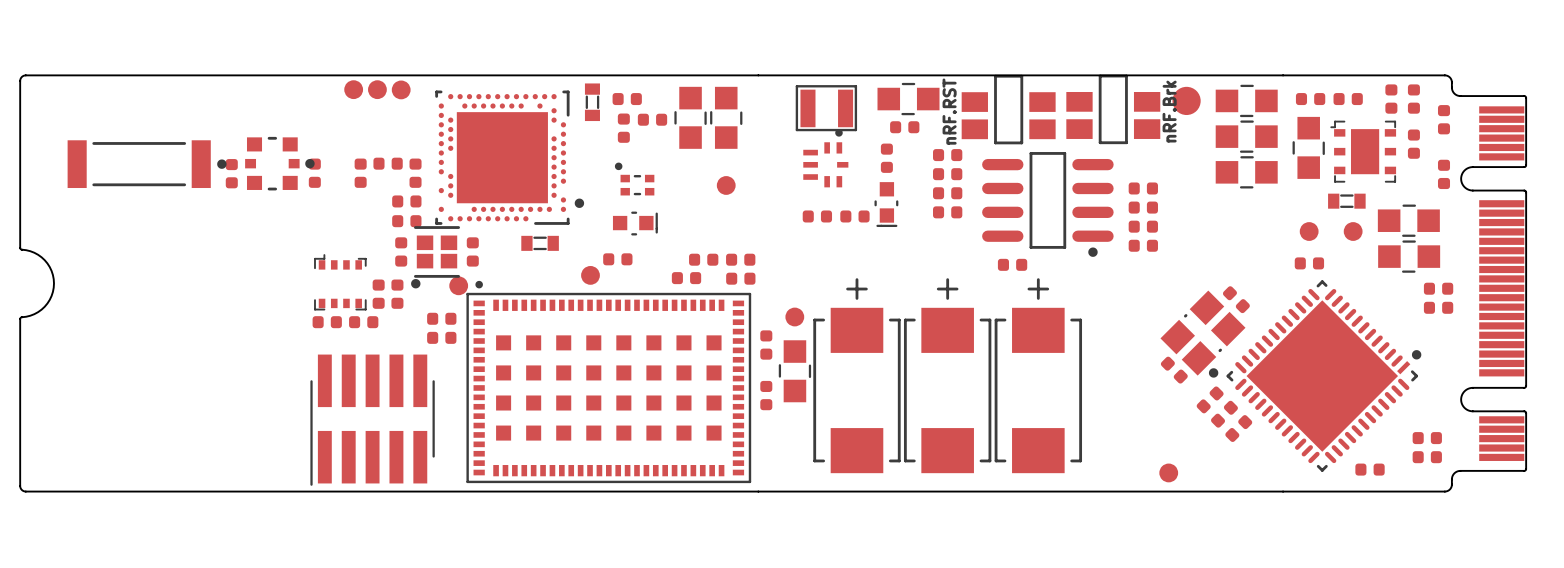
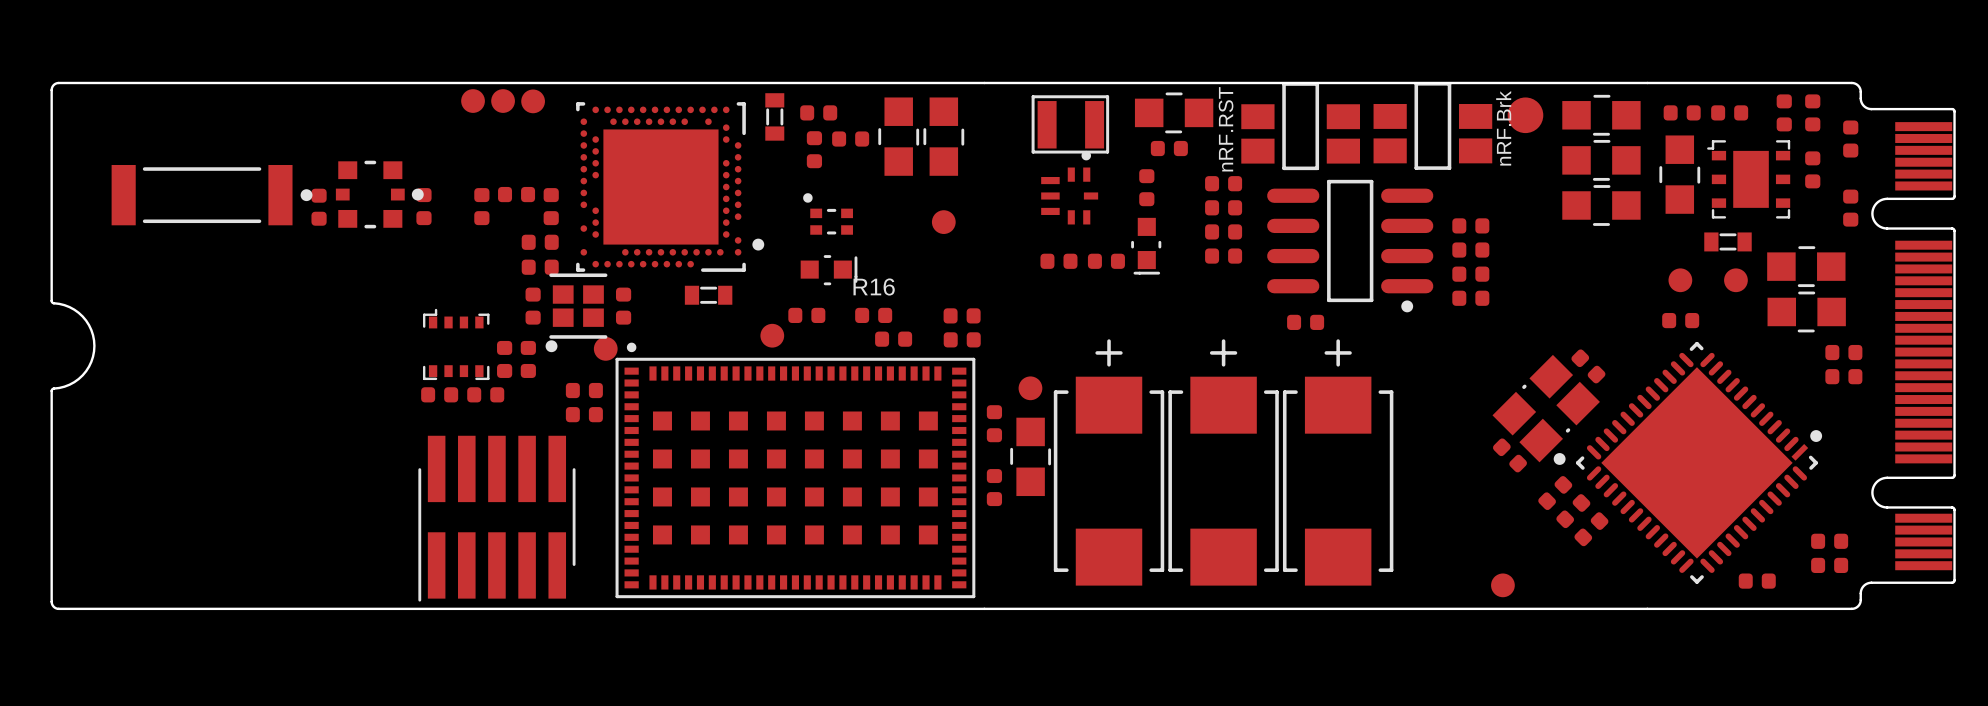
R16: none -> (873, 315)
part: (703, 259) -> none

